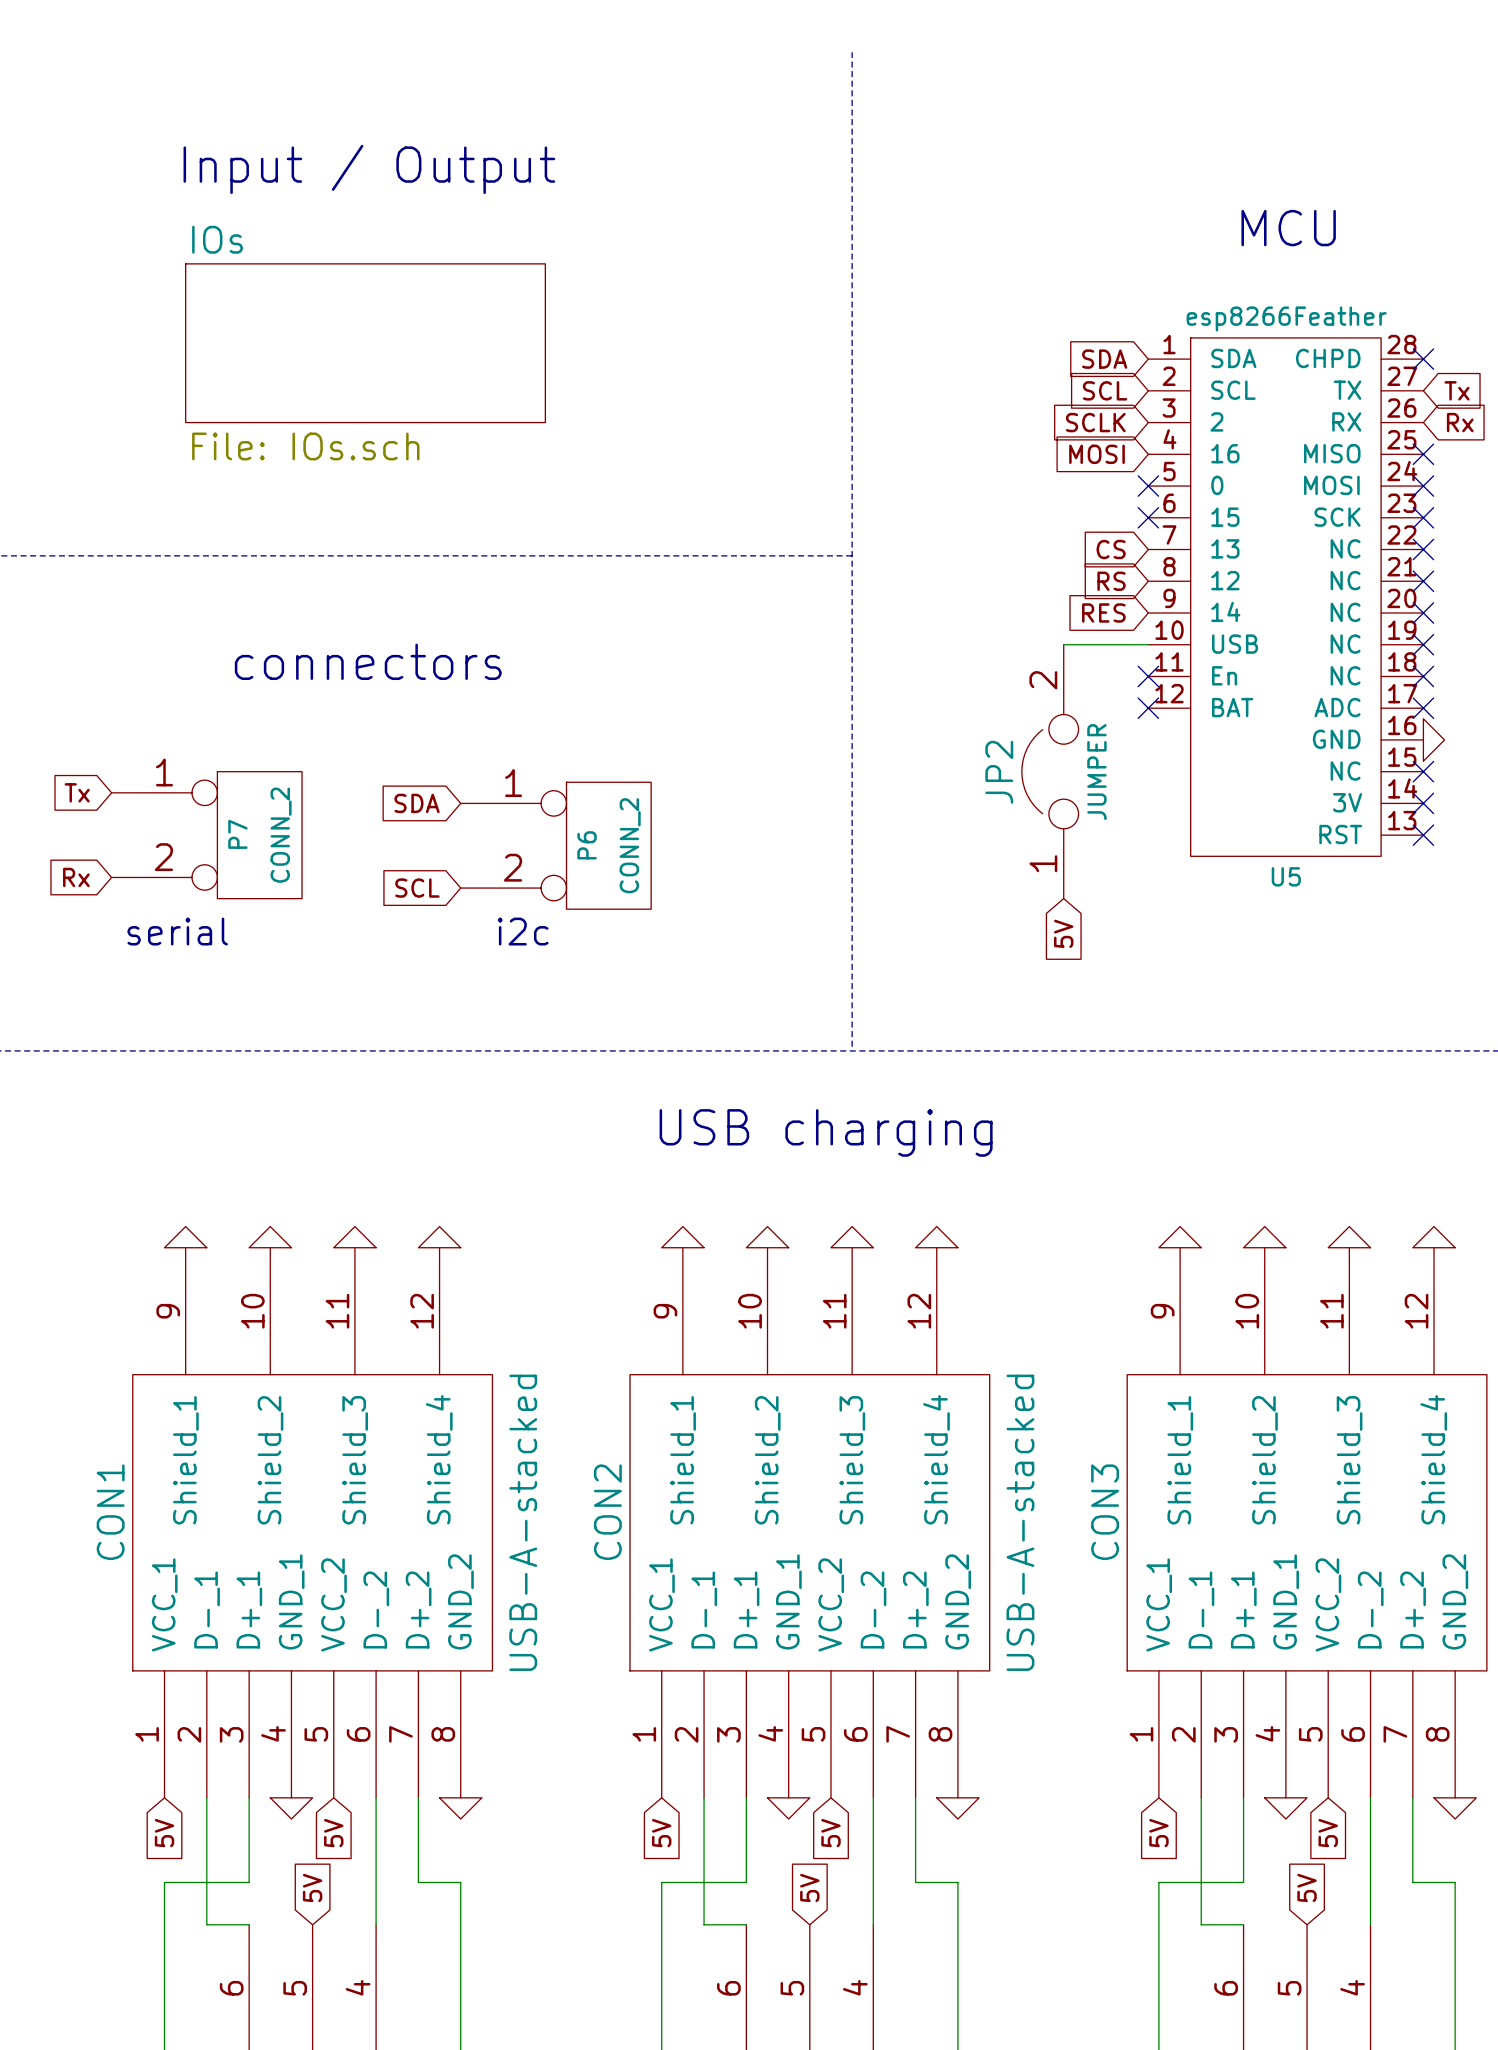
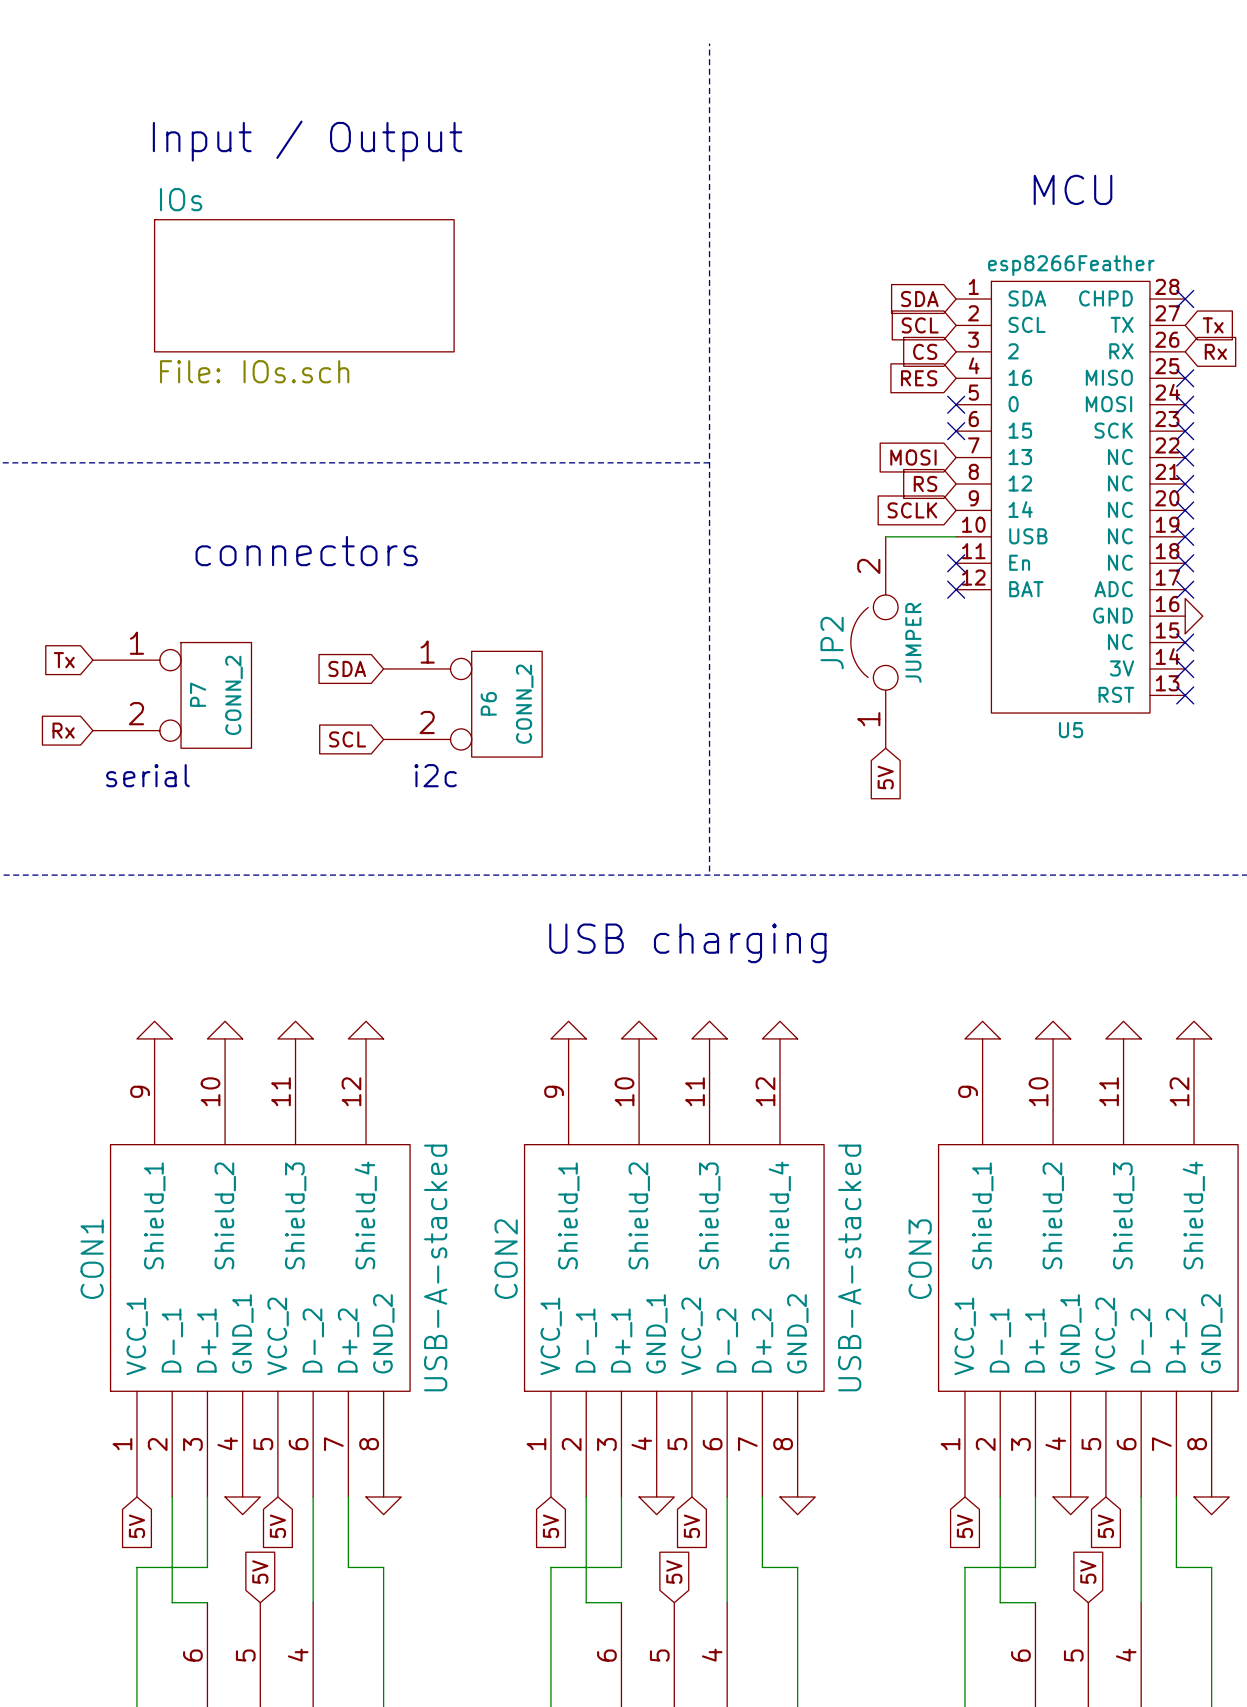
global label: SCLK (1095, 422) -> CS (925, 351)
global label: MOSI (1097, 454) -> RES (919, 378)
global label: CS (1111, 549) -> MOSI (913, 457)
global label: RES (1103, 612) -> SCLK (912, 510)

